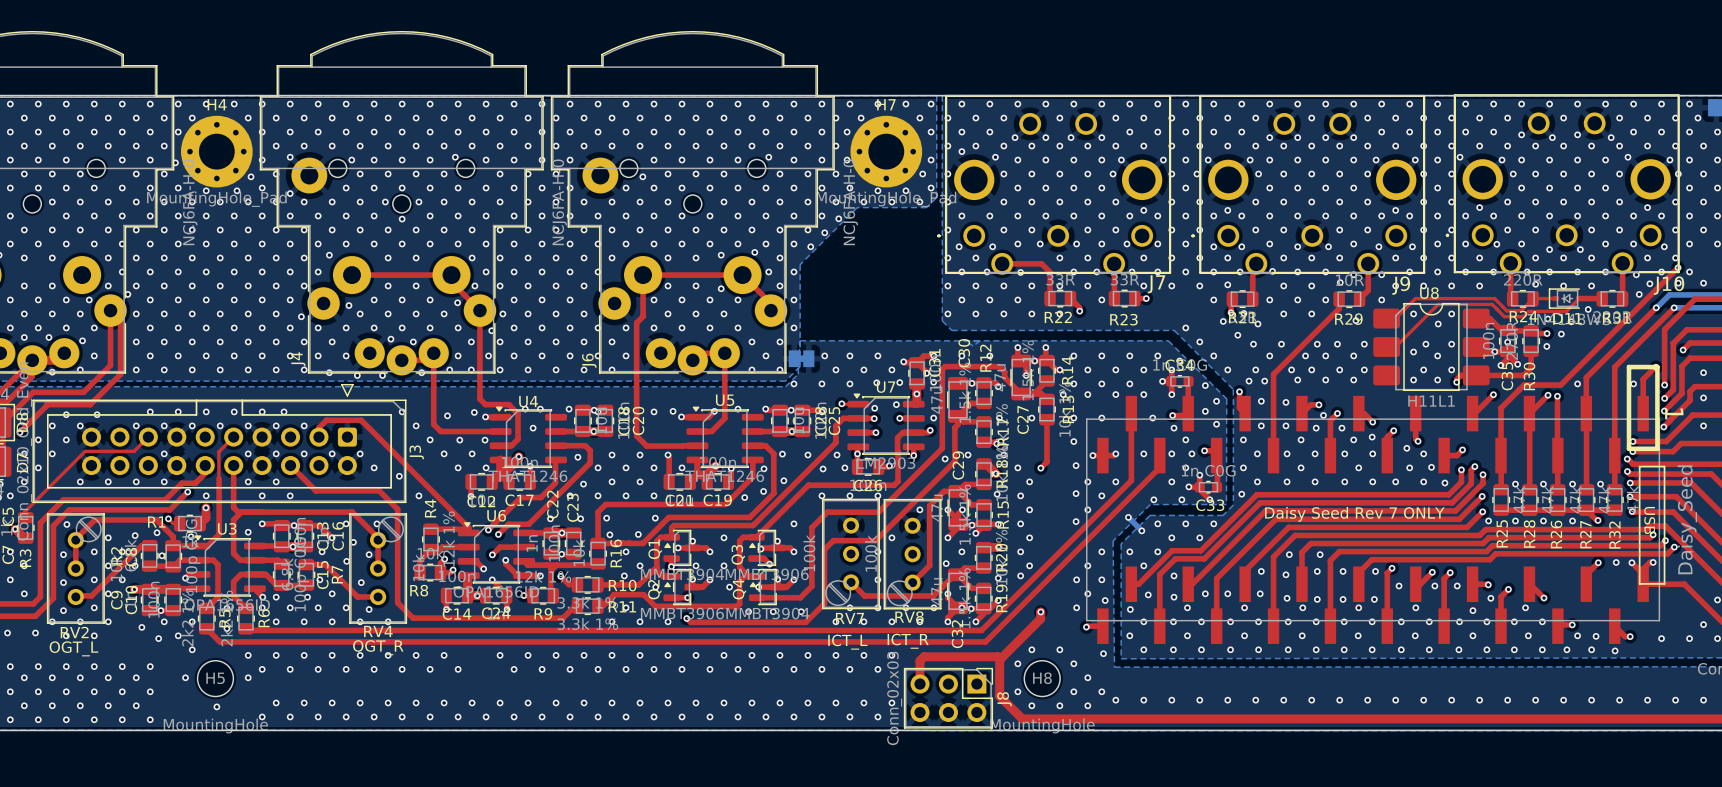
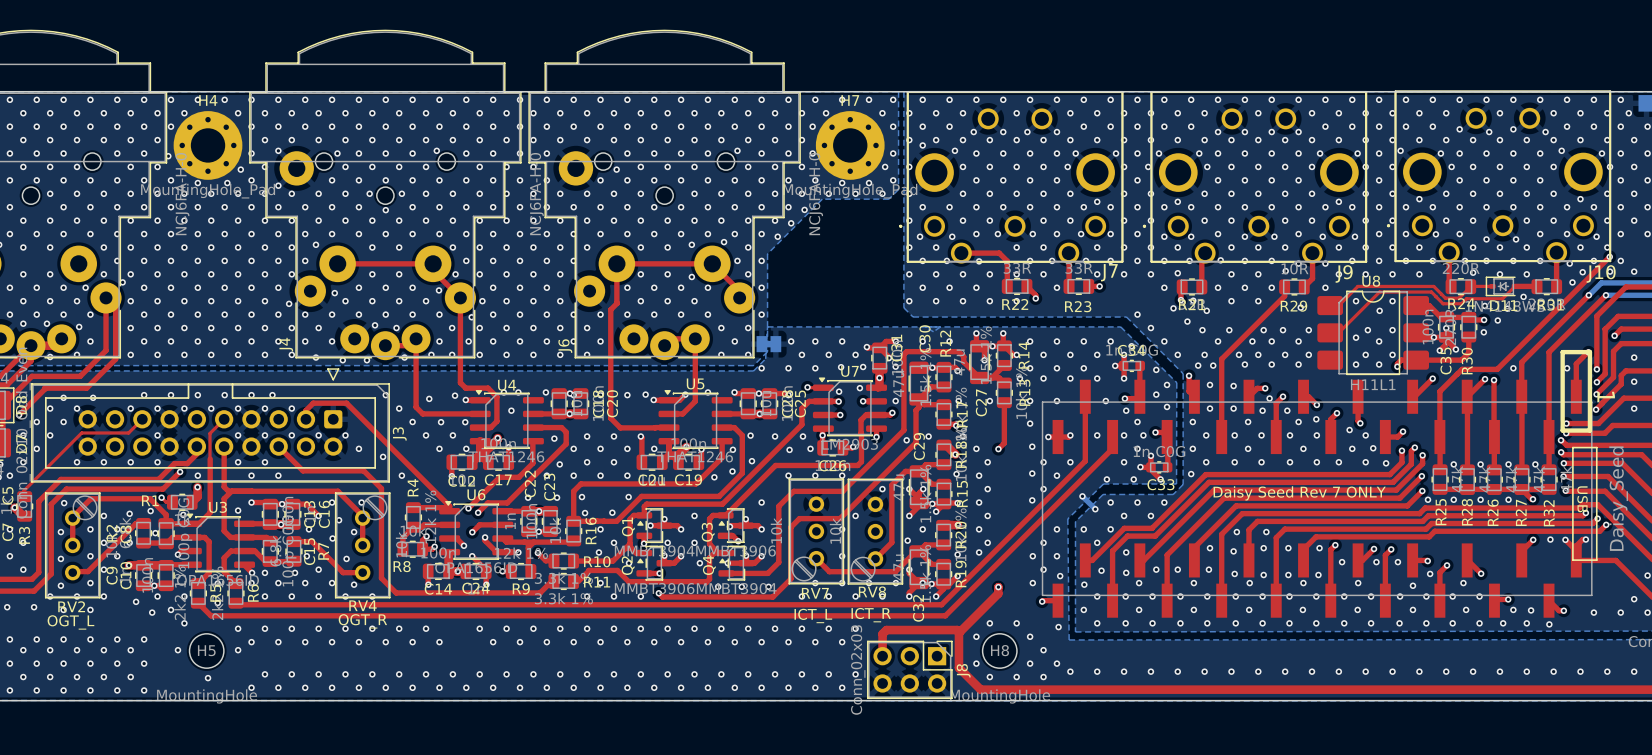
RV7 value: 100k (809, 553) -> 10k (776, 530)
RV8 value: 100k (871, 553) -> 10k (835, 530)

